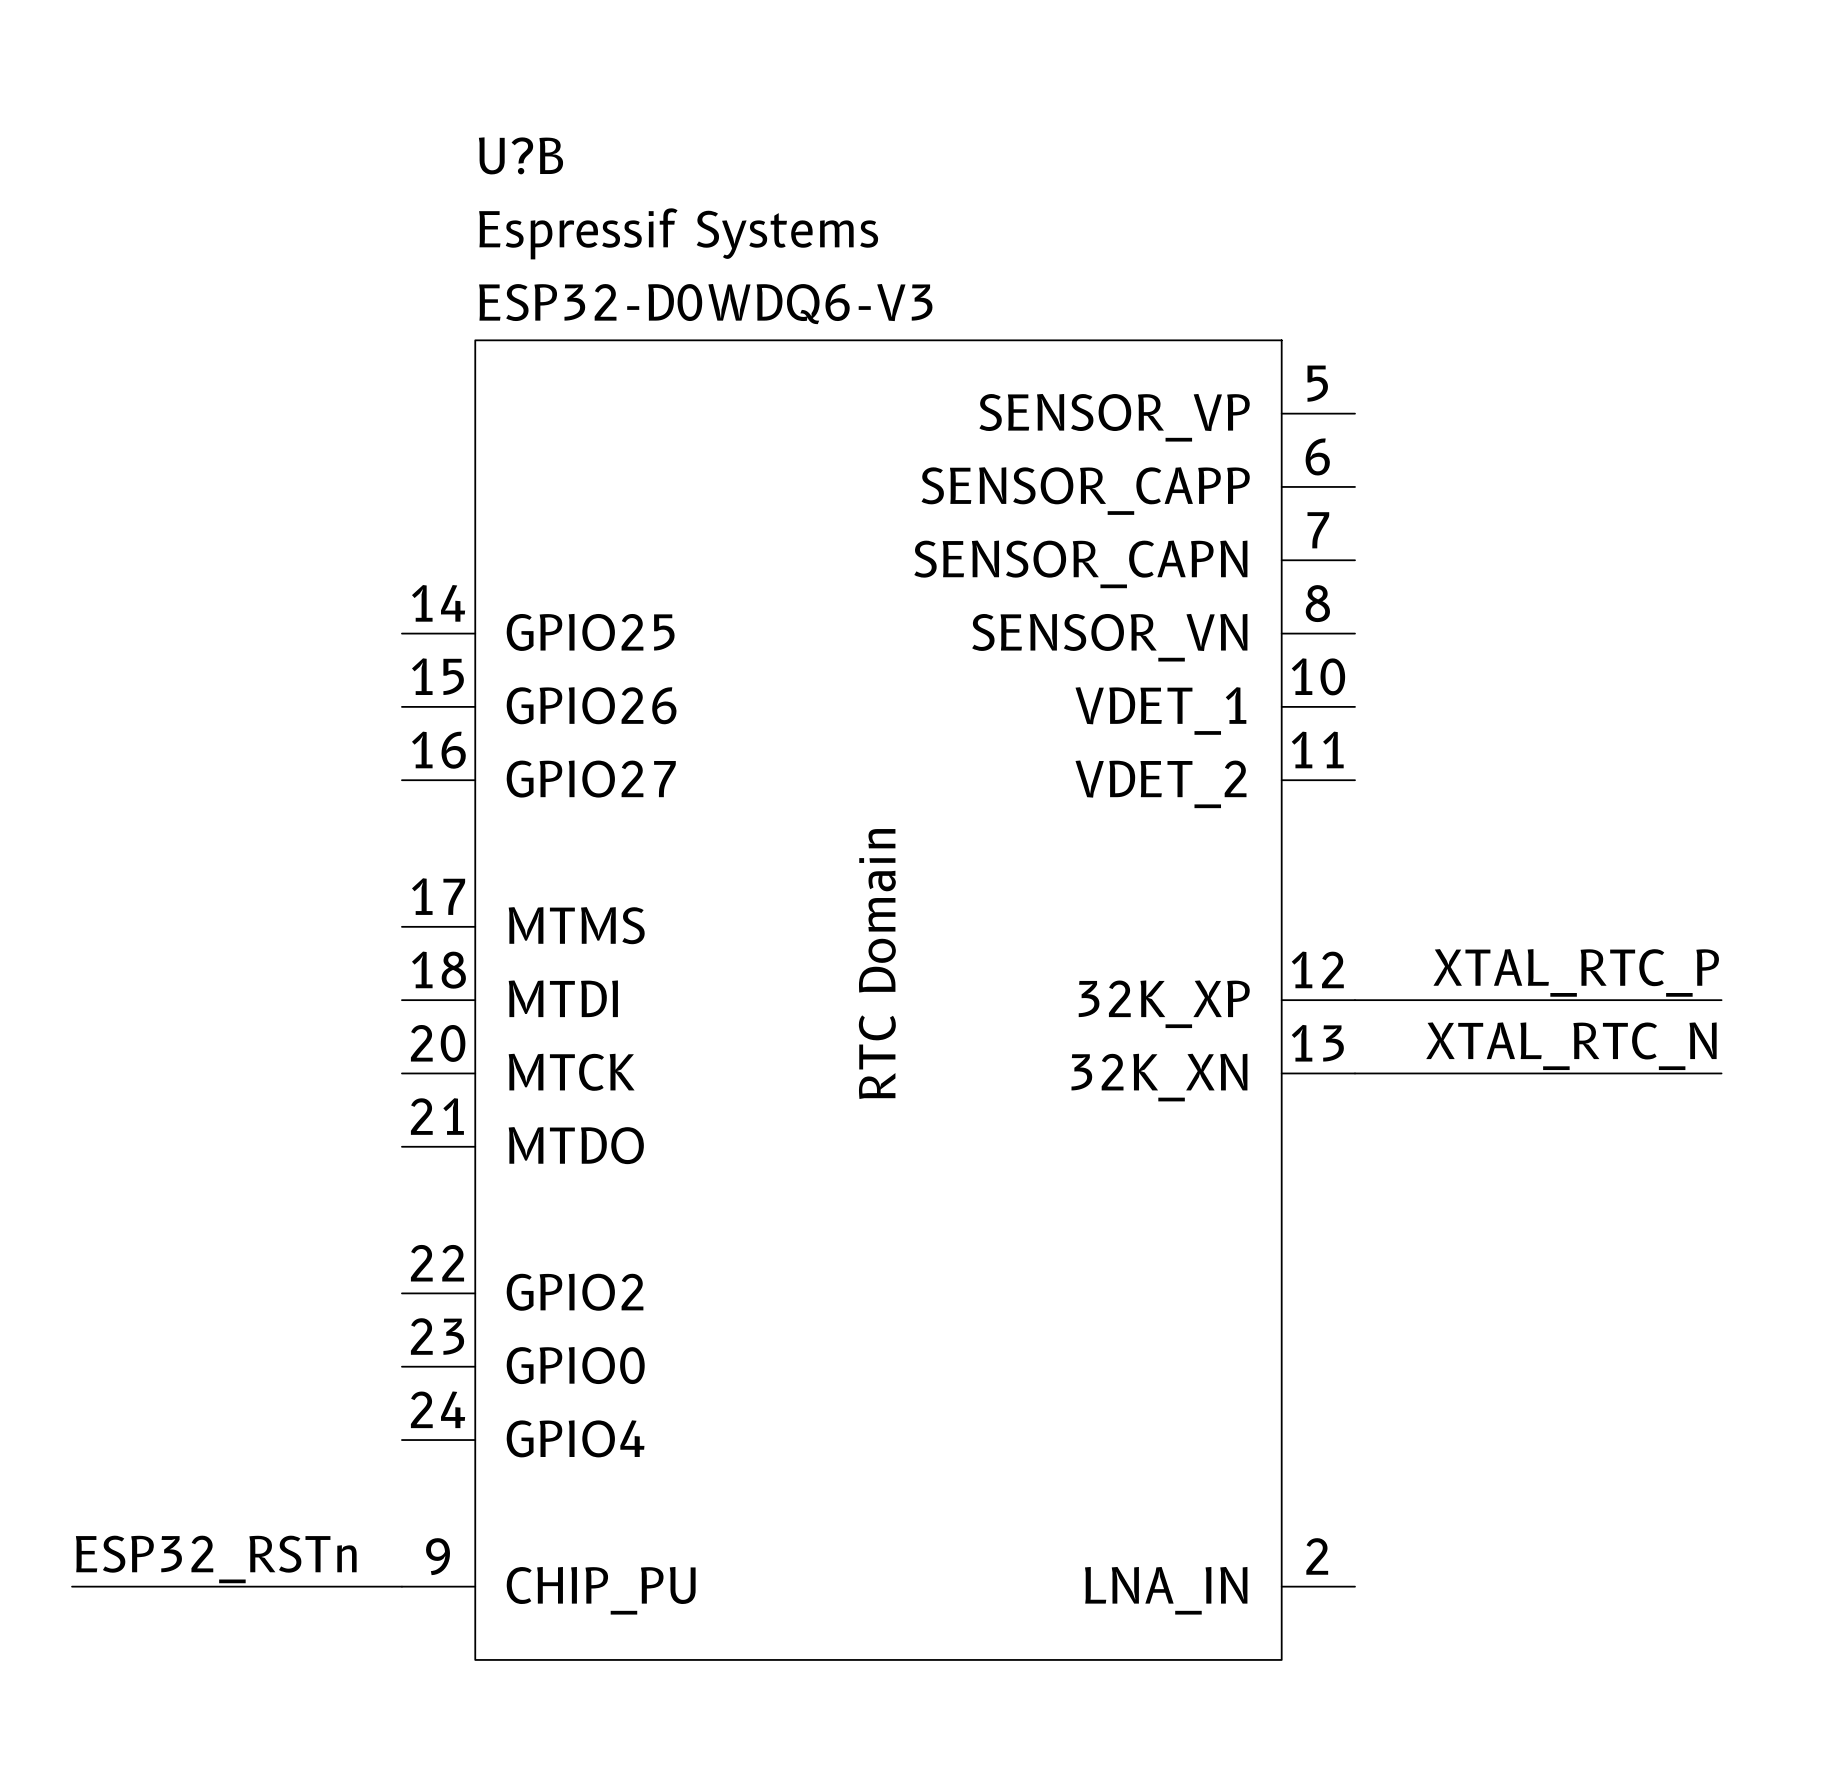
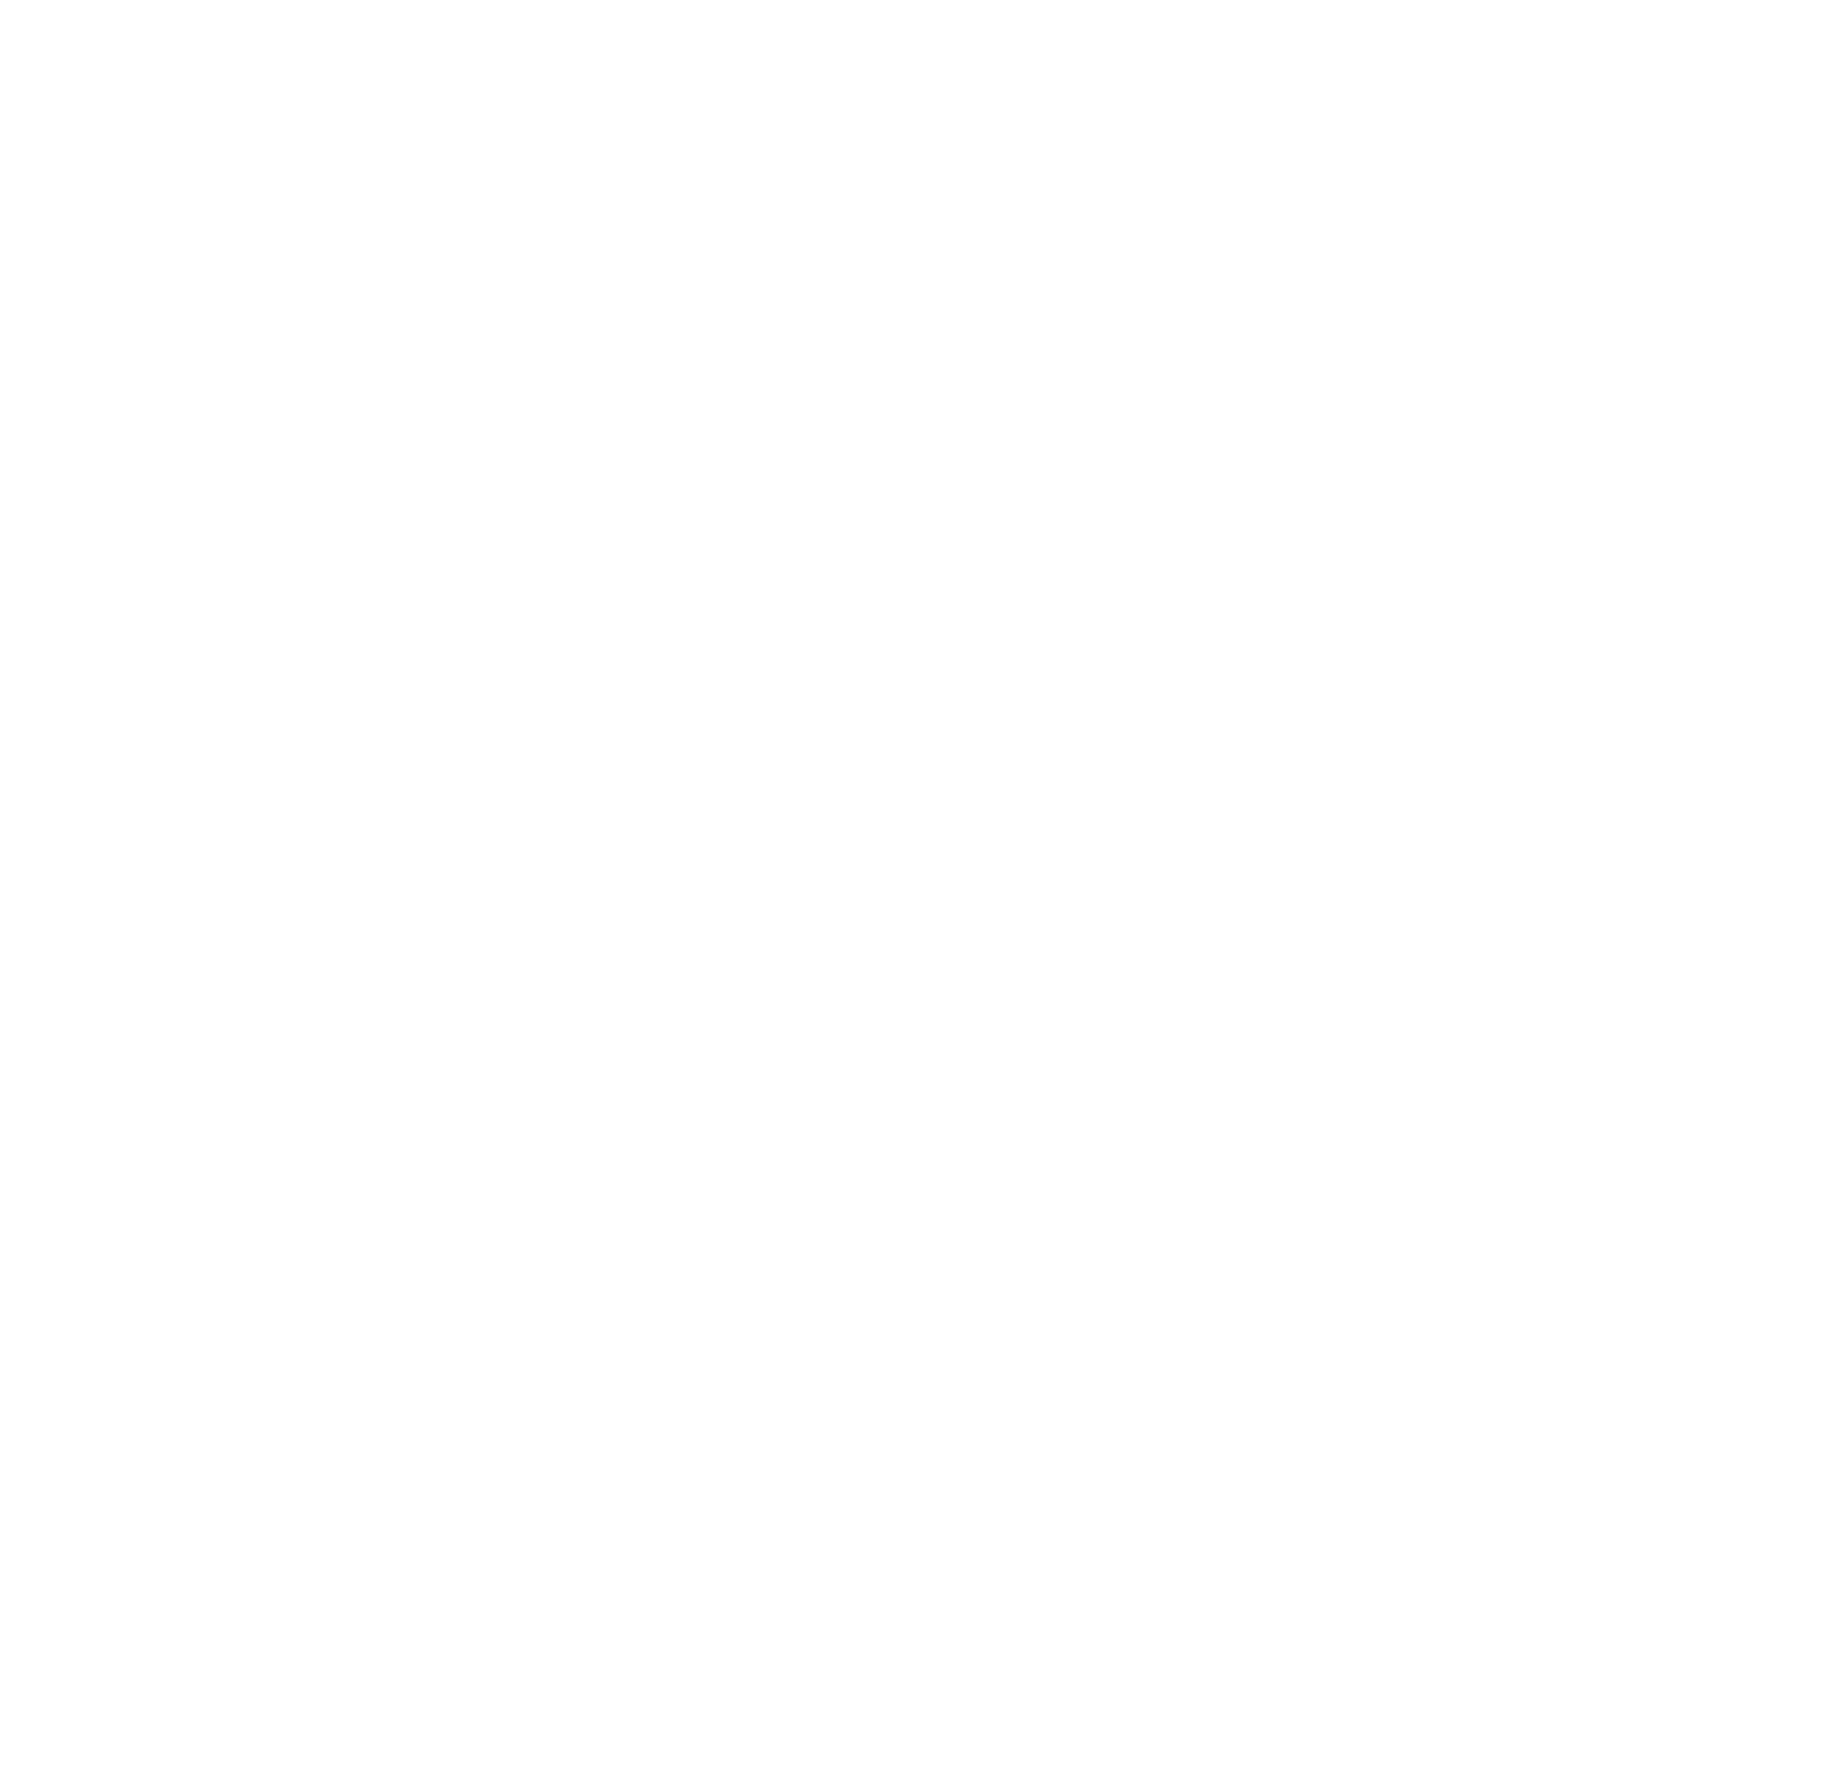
label: XTAL_RTC_P (1576, 972) -> none
U?B: (878, 1000) -> none
wire: (1355, 1000) (1721, 1000) -> none
label: XTAL_RTC_N (1571, 1046) -> none
wire: (1355, 1073) (1721, 1073) -> none
label: ESP32_RSTn (216, 1559) -> none
wire: (72, 1586) (401, 1586) -> none

